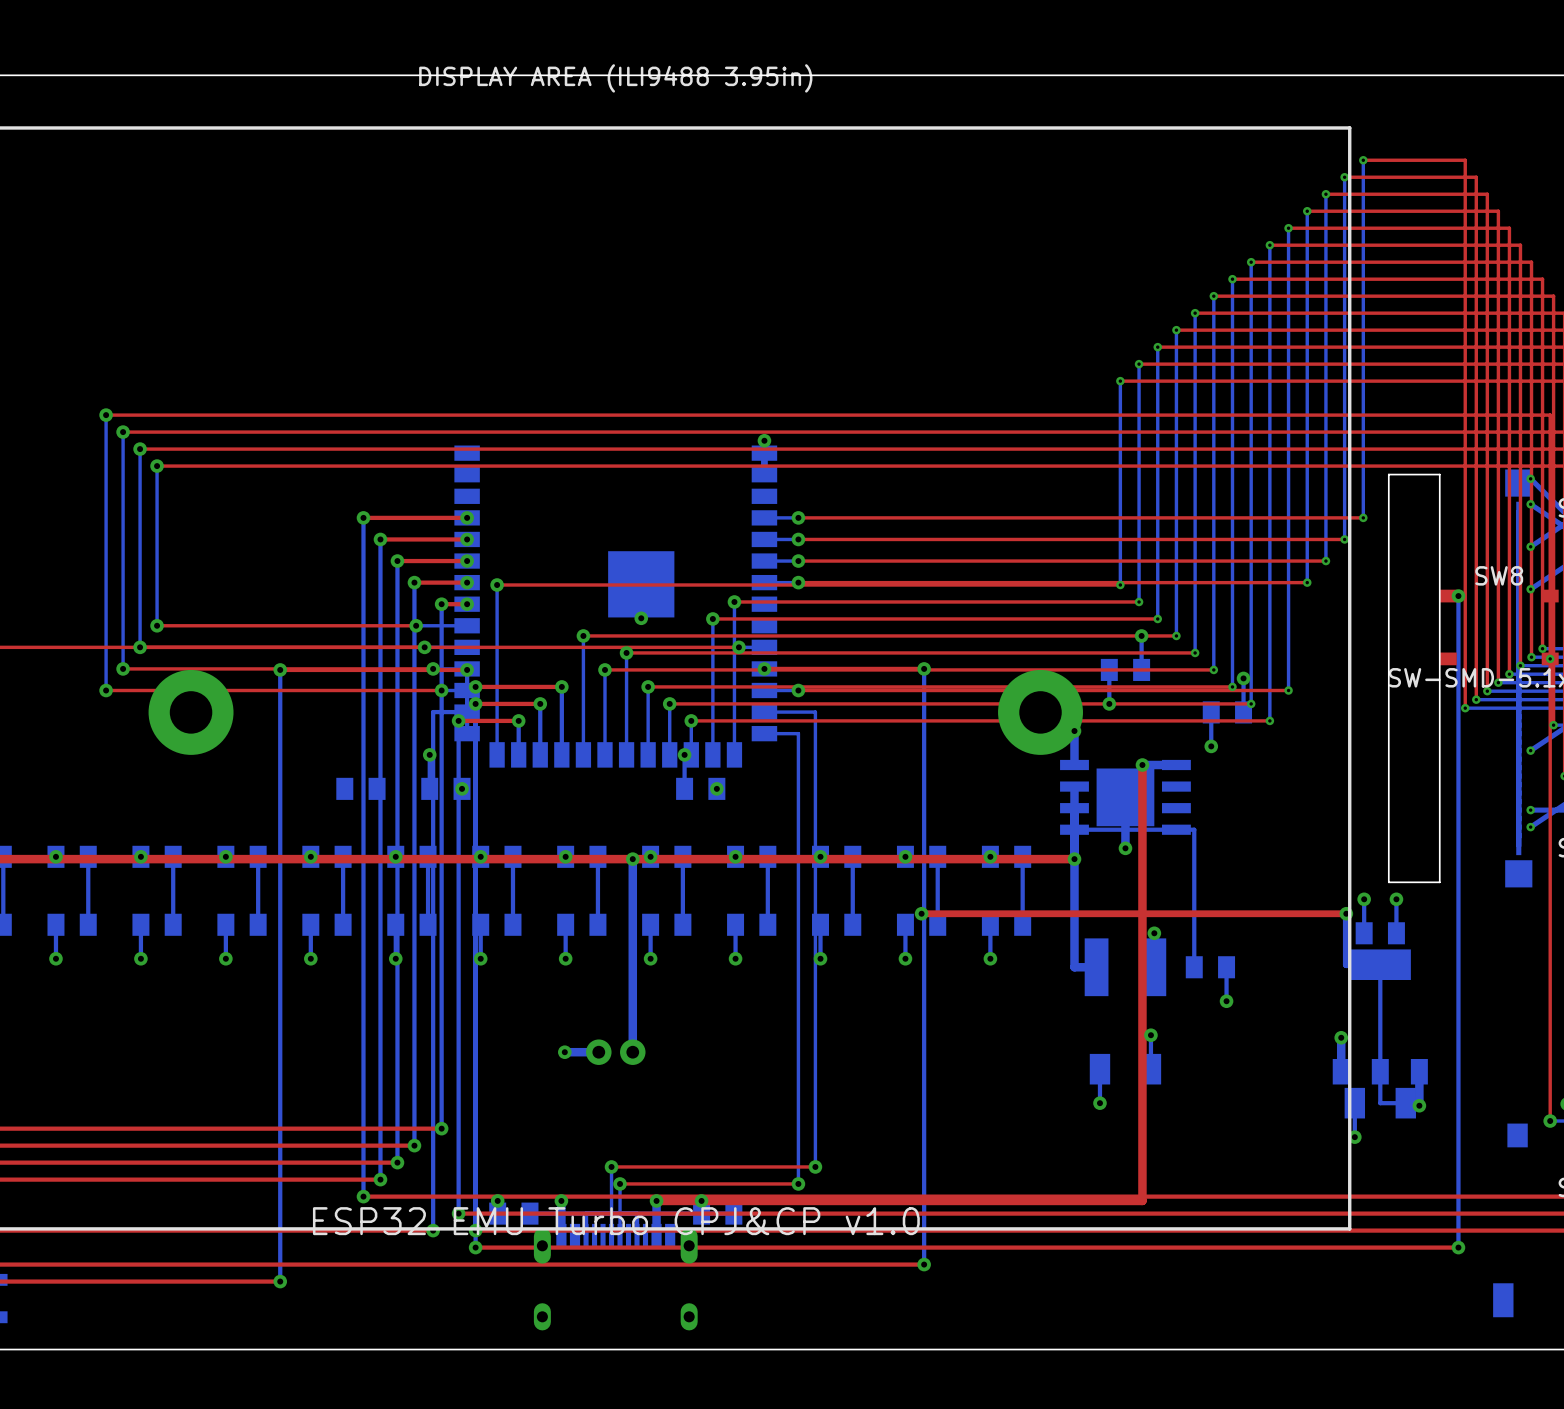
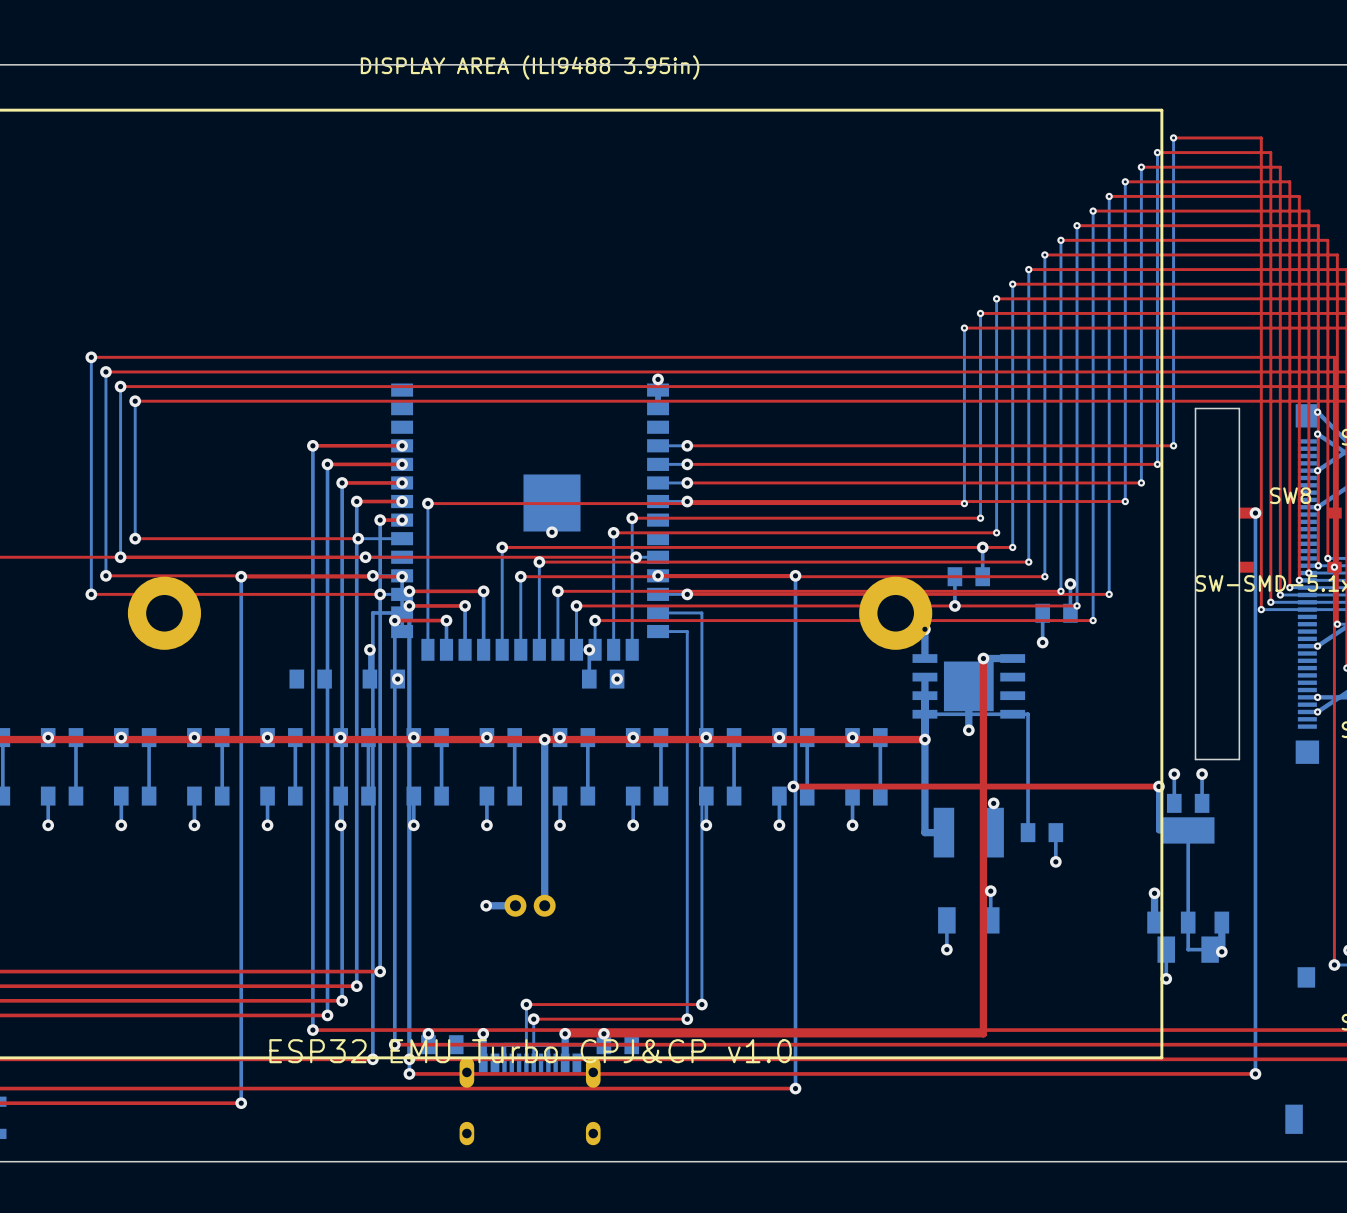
part footprint: [1505, 469, 1533, 888] -> [1295, 404, 1320, 764]

